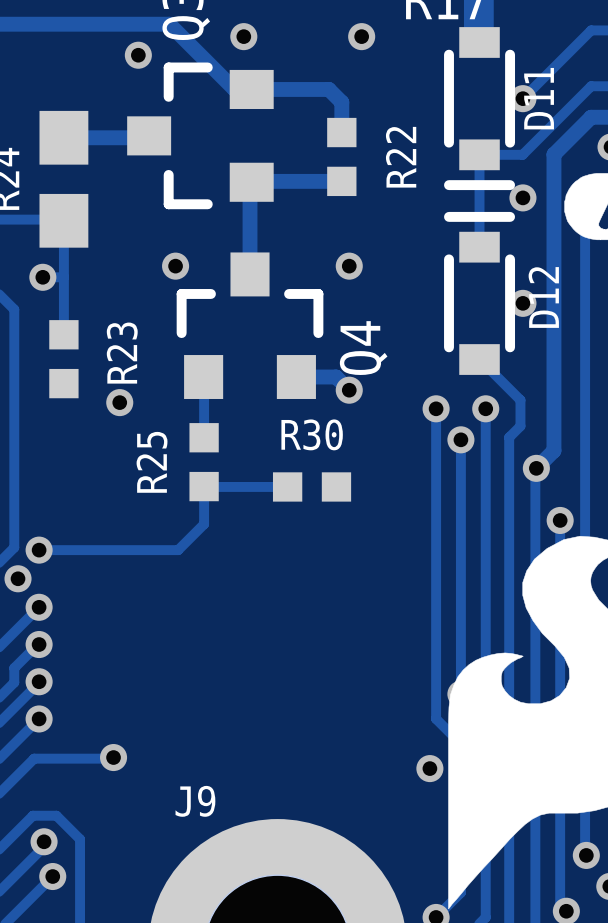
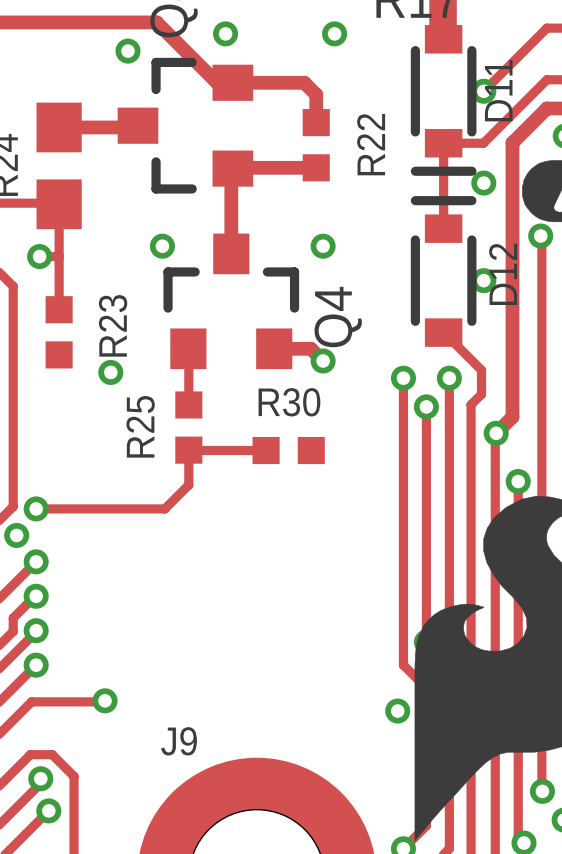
track: (585, 204) (585, 854) -> (540, 236) (541, 790)
via: none -> (540, 236)

